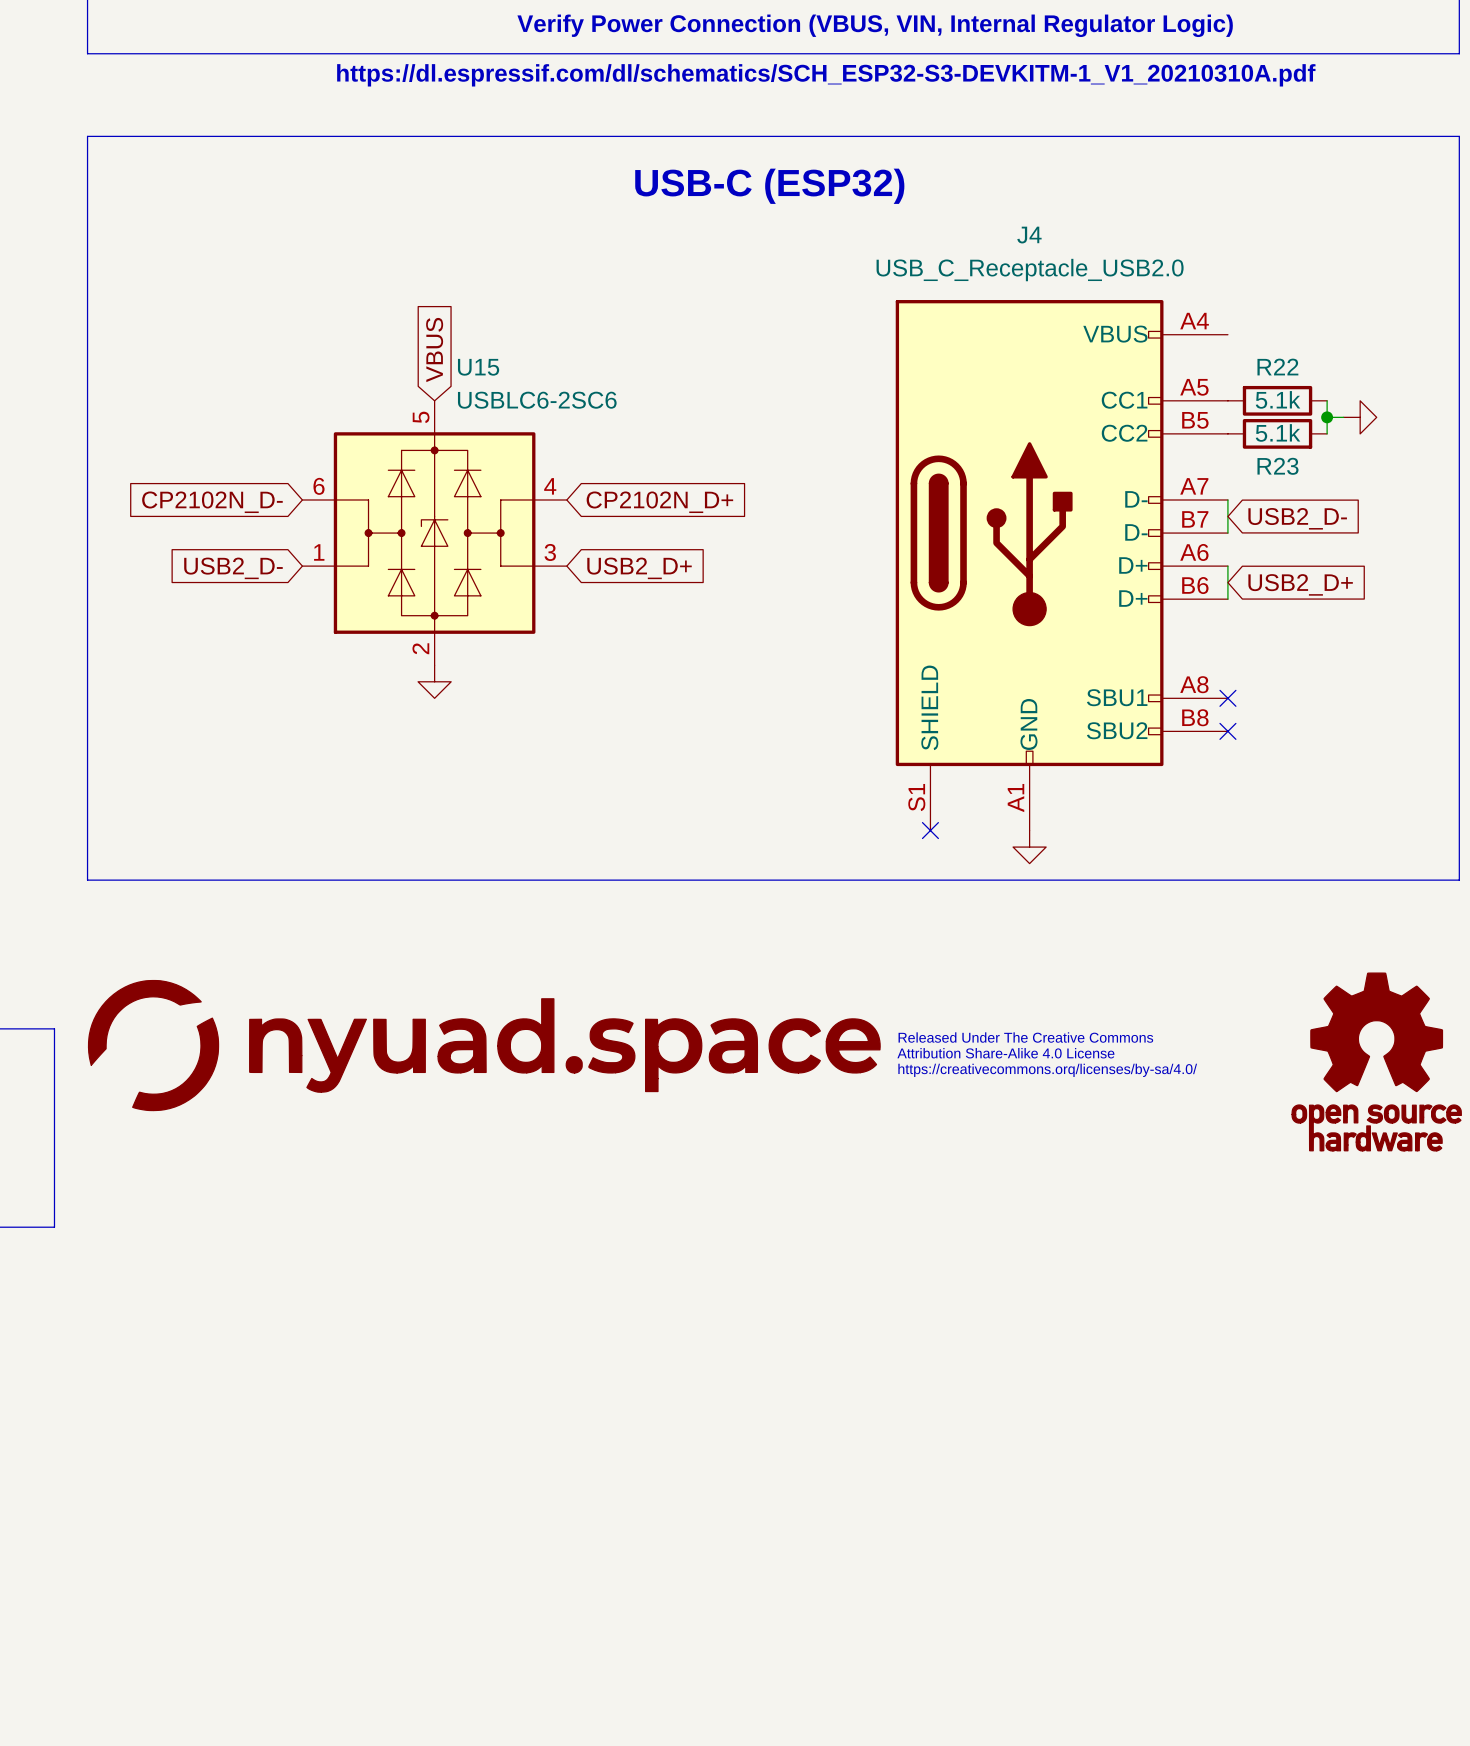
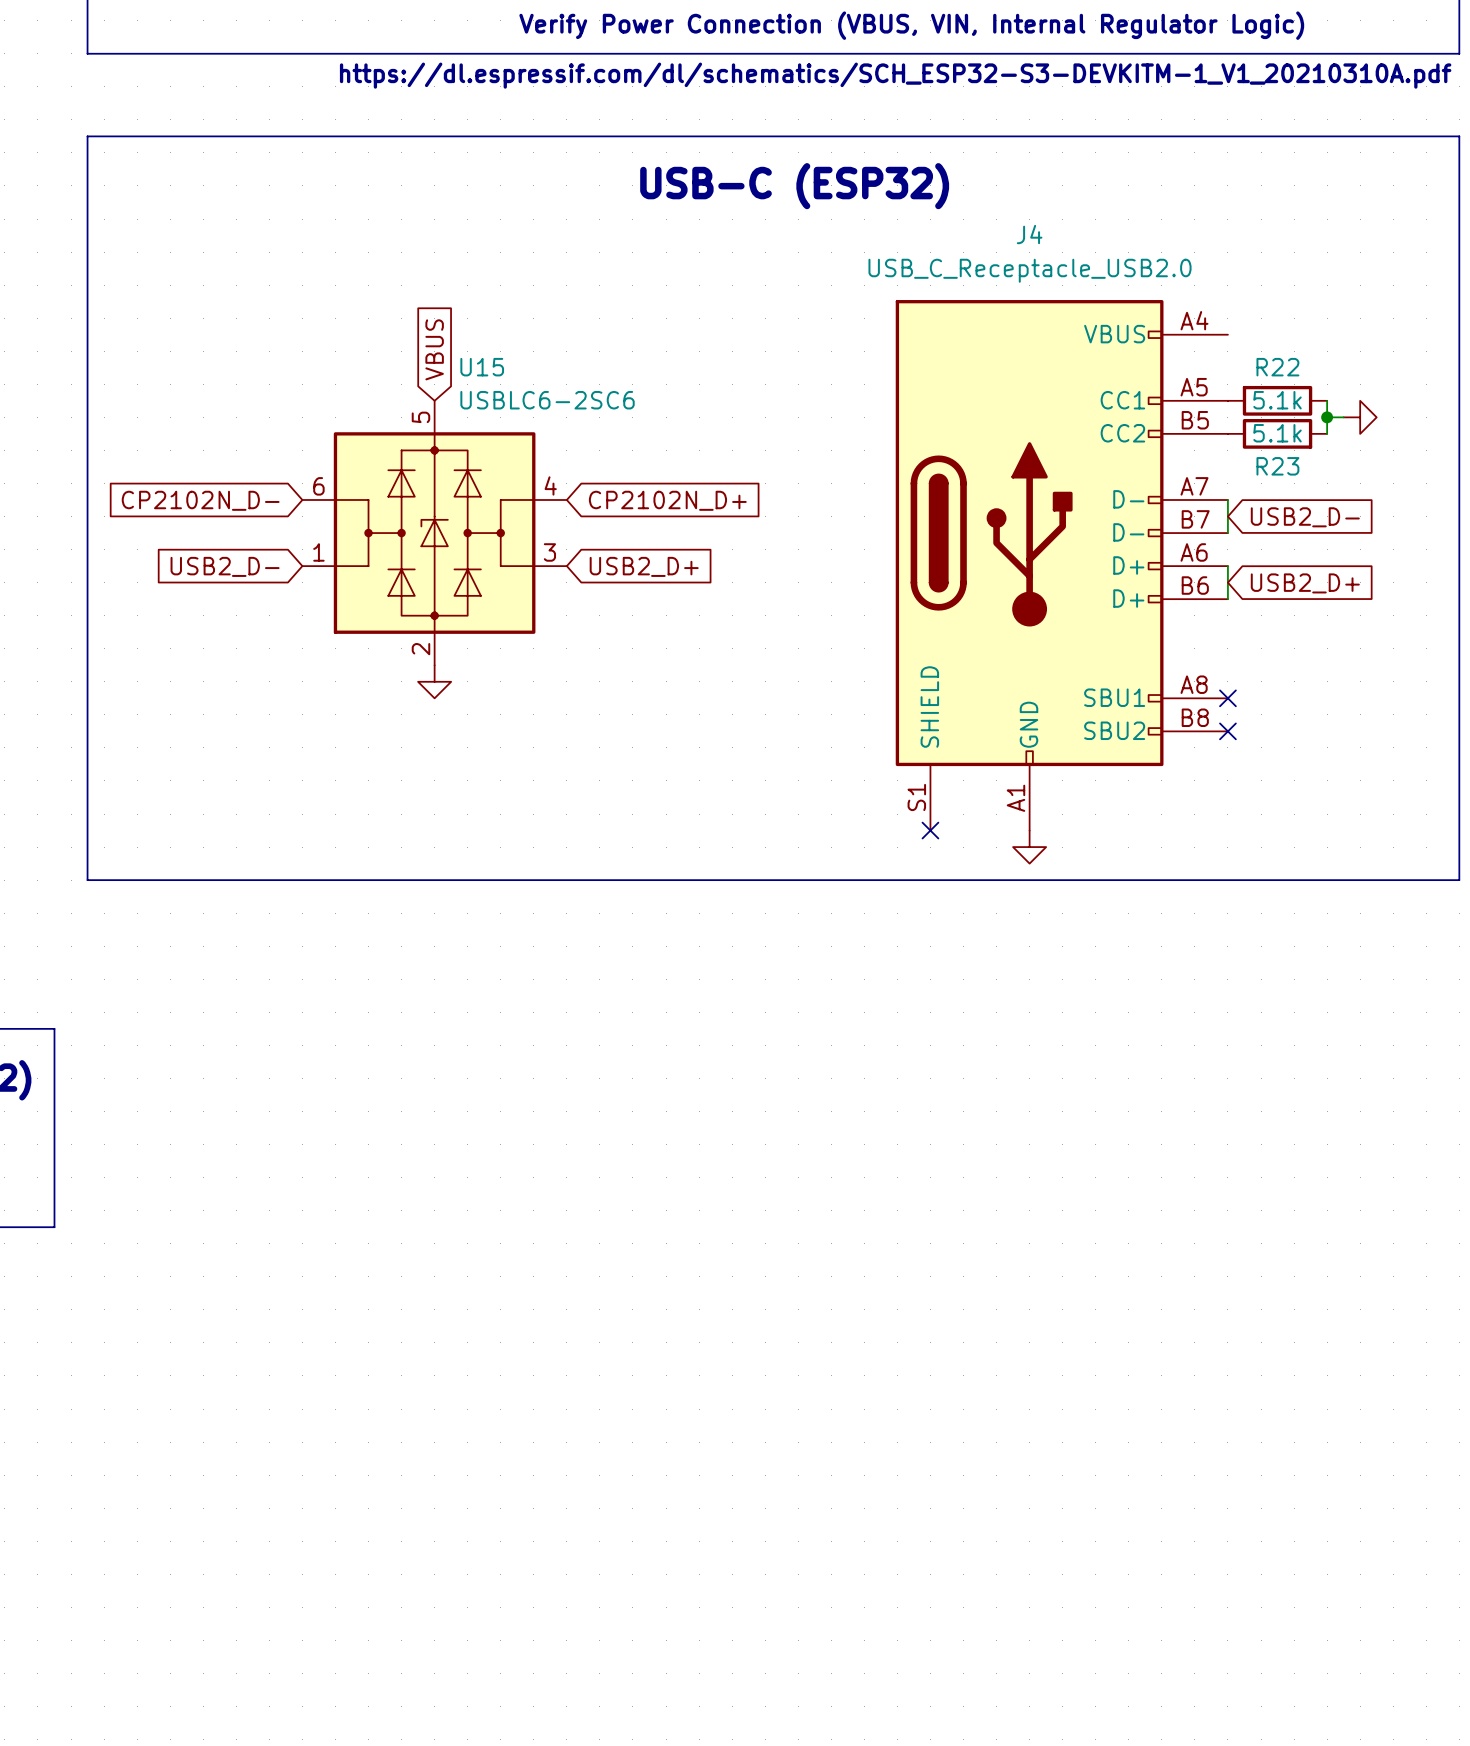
text: Released Under The Creative Commons (1025, 1037) -> none
power symbol: (484, 1045) -> none
text: Attribution Share-Alike 4.0 License (1005, 1053) -> none
power symbol: (1376, 1061) -> none
text: https://creativecommons.orq/licenses/by-sa/4.0/ (1047, 1070) -> none

